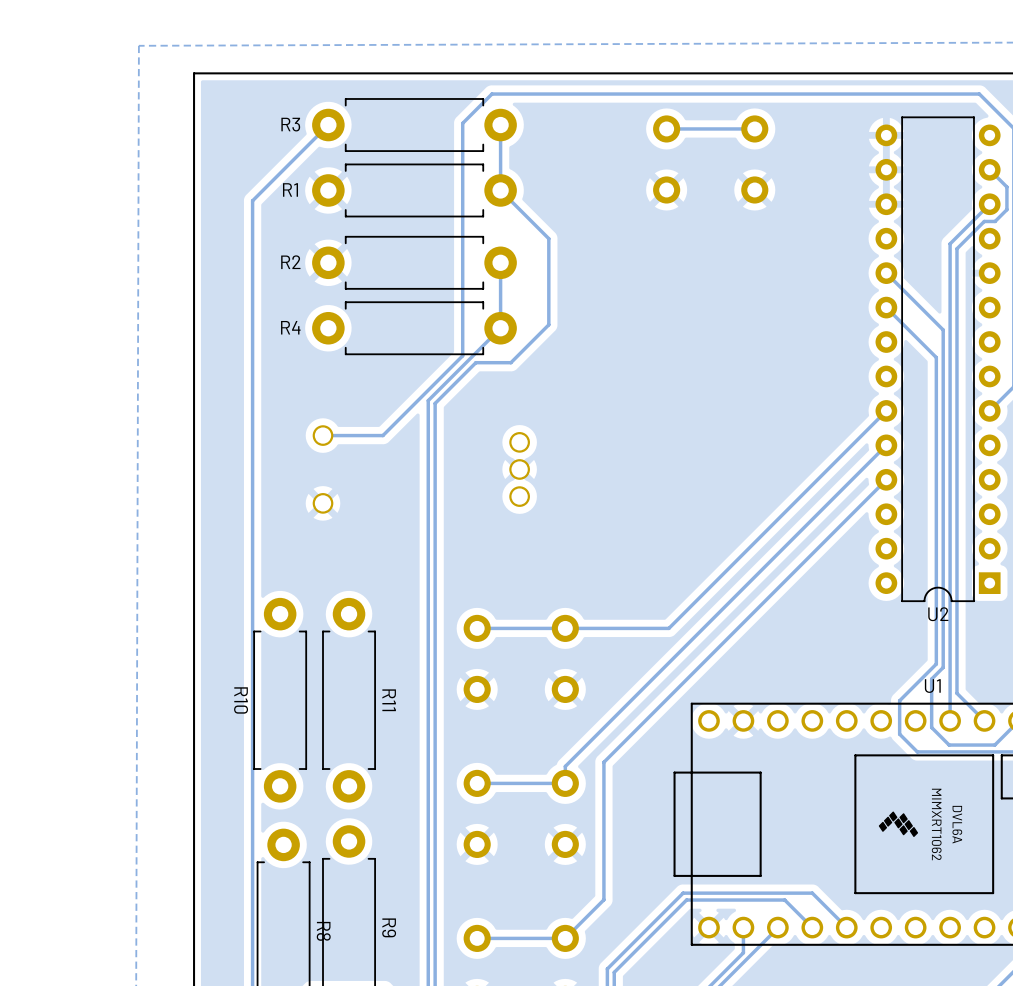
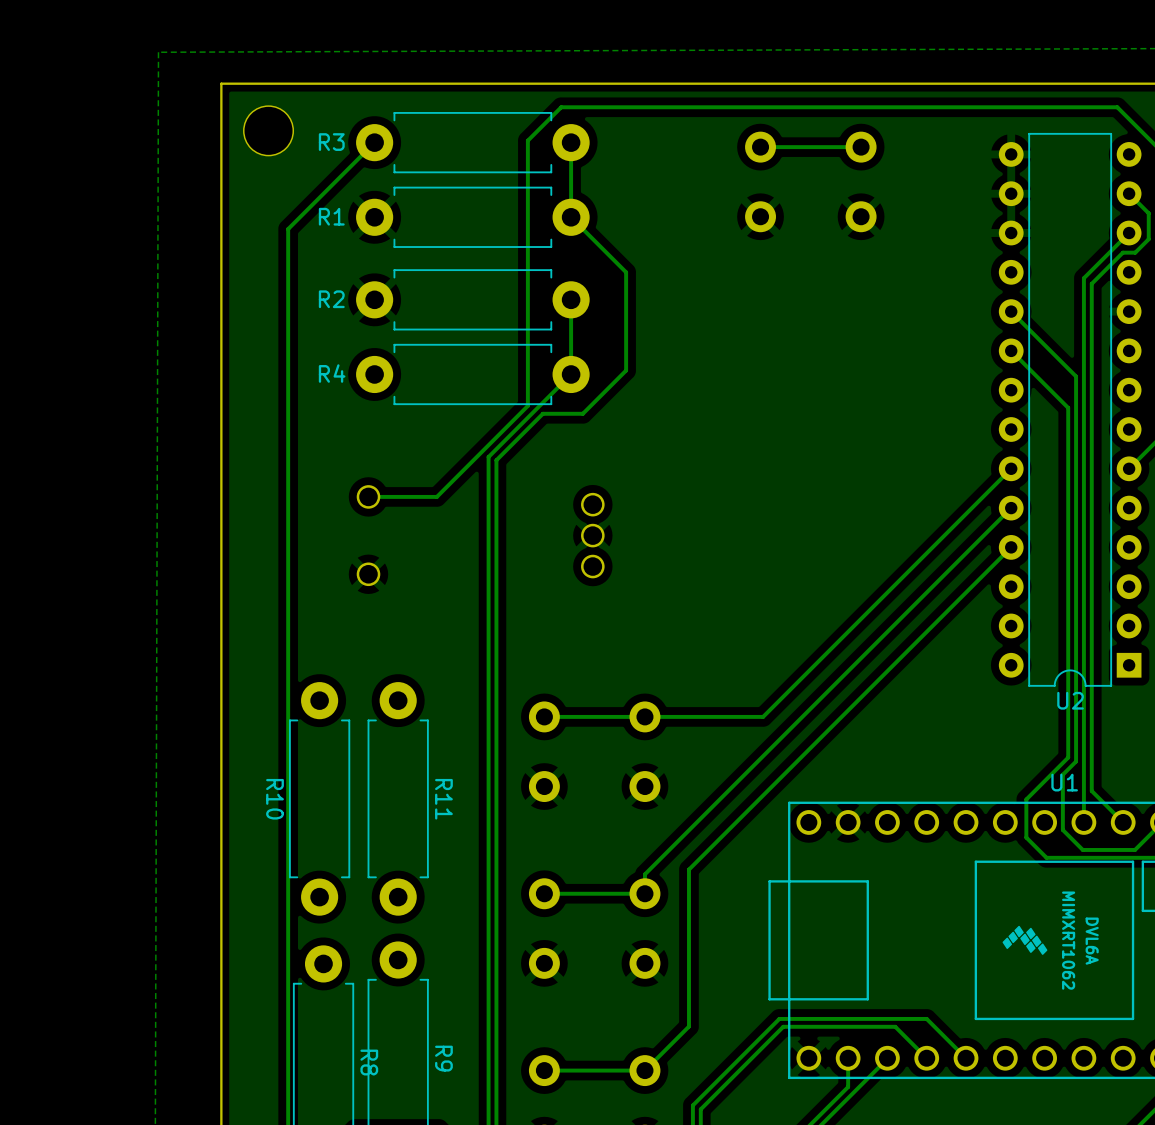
part: none -> (268, 130)

